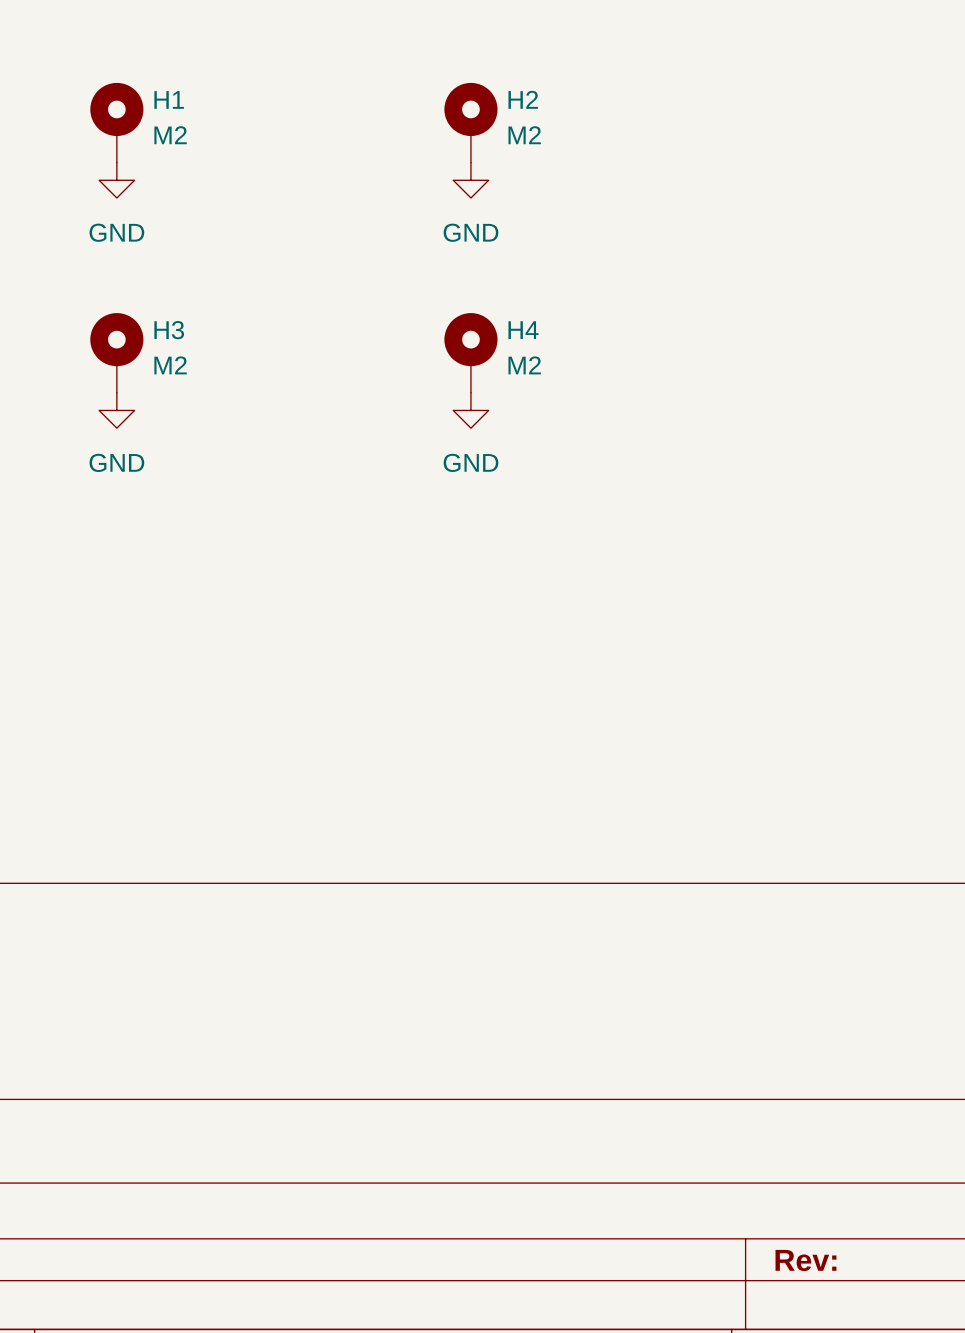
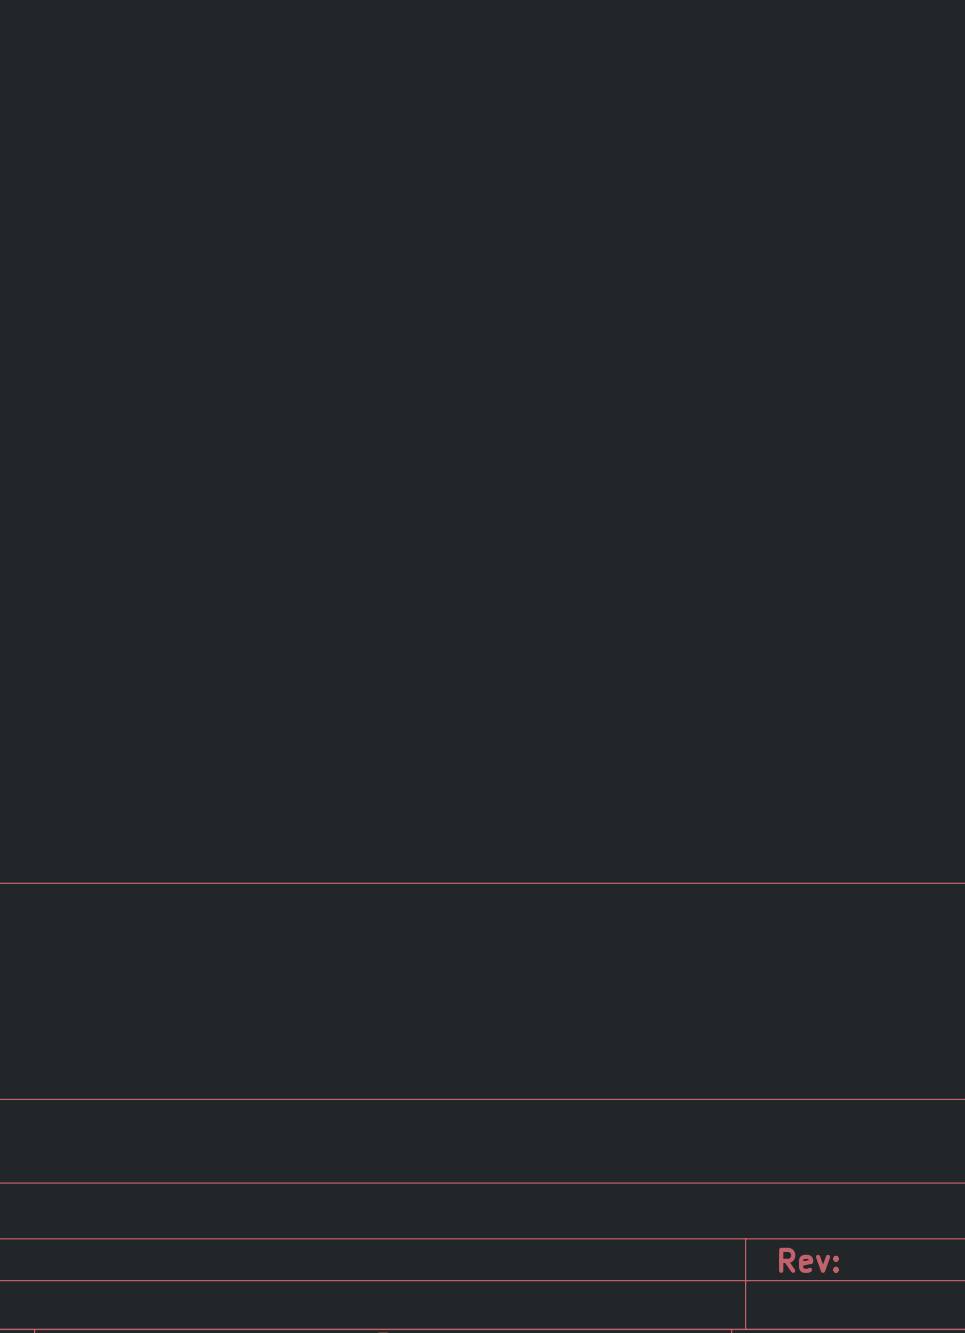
H1: M2 (116, 122) -> none
H2: M2 (470, 122) -> none
power symbol: GND (116, 180) -> none
power symbol: GND (470, 180) -> none
H3: M2 (116, 352) -> none
H4: M2 (470, 352) -> none
power symbol: GND (116, 410) -> none
power symbol: GND (470, 410) -> none

